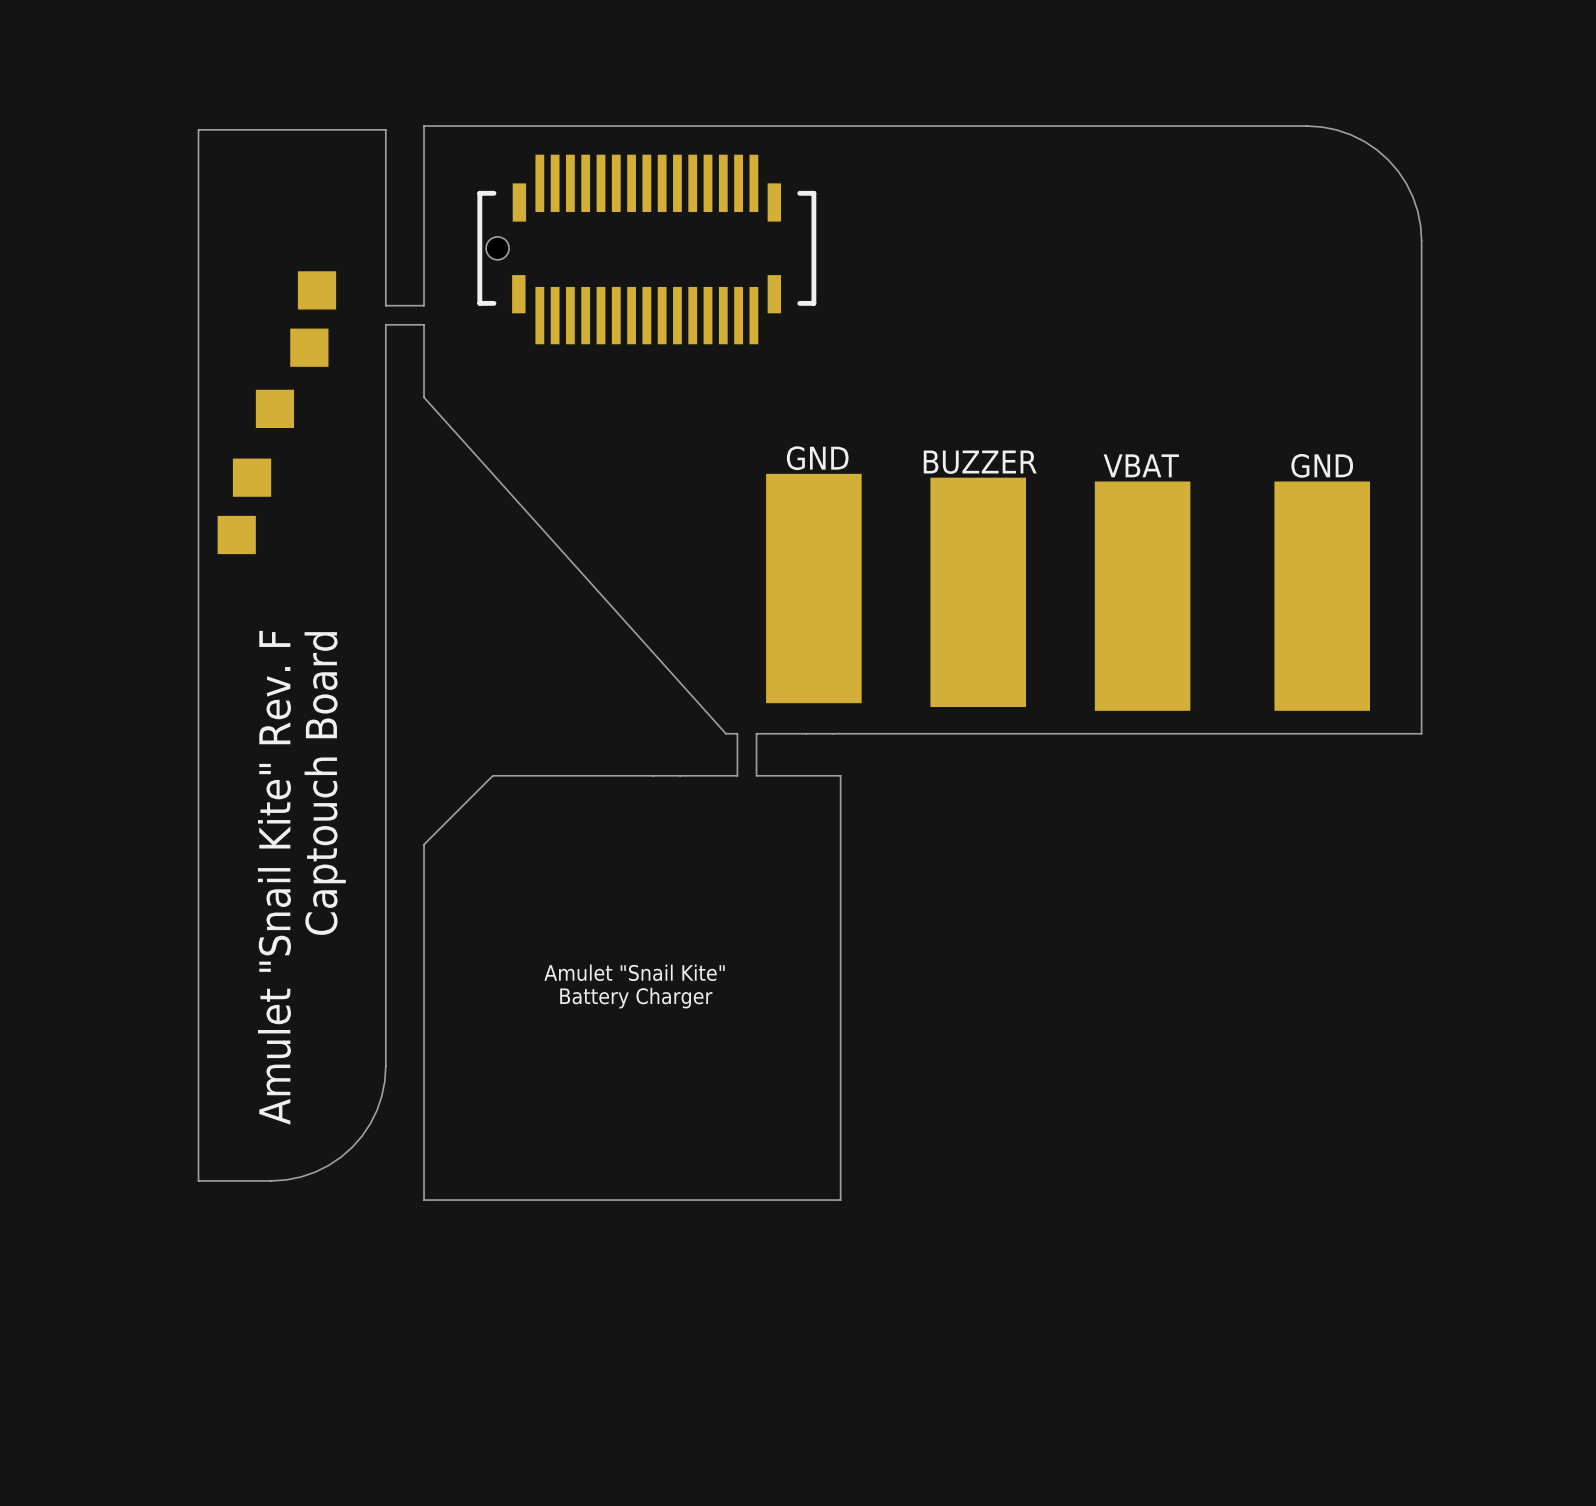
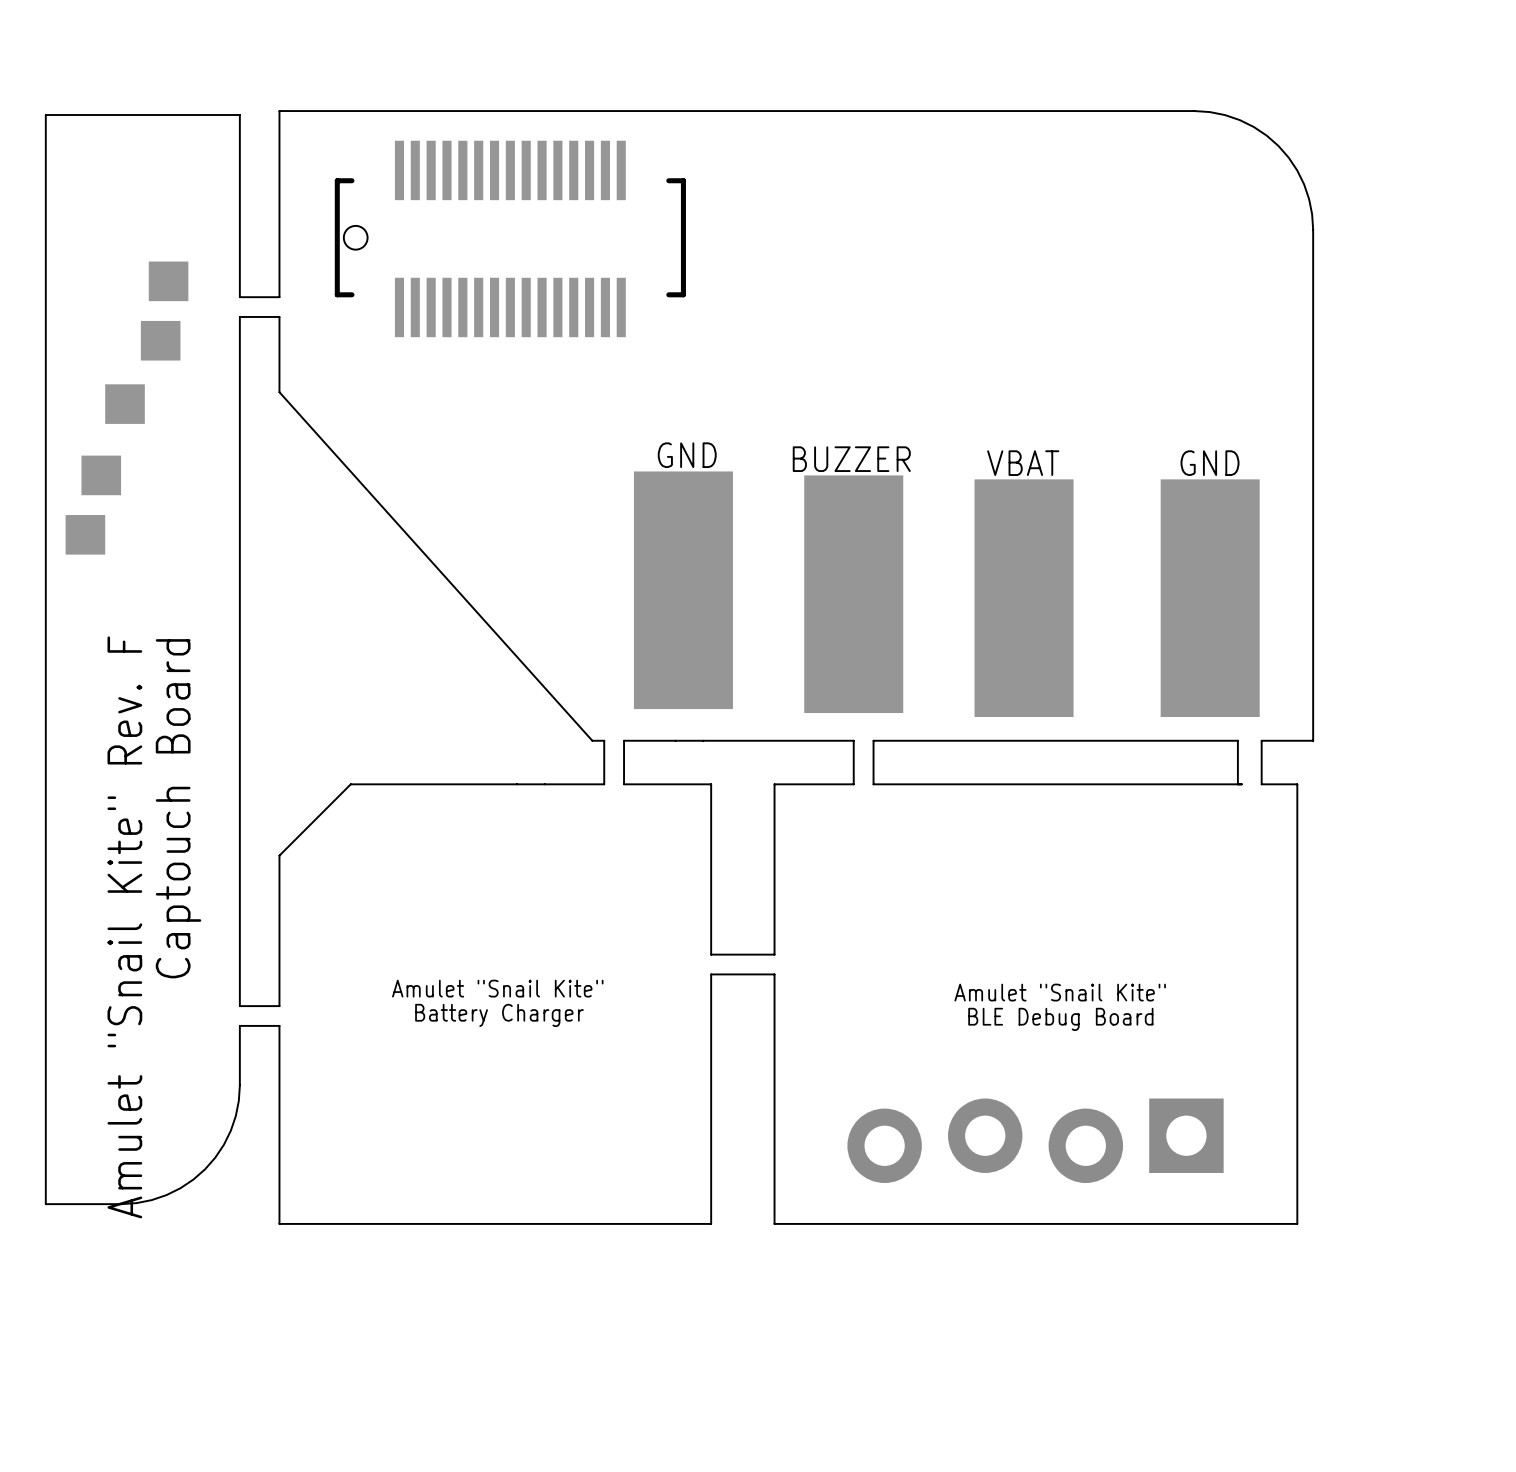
part footprint: [477, 154, 817, 345] -> [334, 140, 686, 338]
board edge: (997, 733) (978, 733) -> (711, 954) (774, 954) (774, 784) (853, 784) (853, 740)
board edge: none -> (873, 740) (873, 784) (1241, 784)
board edge: (1371, 733) (1348, 733) -> (1237, 784) (1237, 740)
board edge: (840, 940) (840, 959) -> (1261, 740) (1261, 784) (1297, 784) (1297, 1223) (774, 1223) (774, 974) (711, 974)
text: none -> Amulet "Snail Kite" (1060, 992)
board edge: (385, 989) (385, 1008) -> (279, 1025) (239, 1025)
board edge: (424, 989) (424, 1008) -> (279, 1006) (239, 1006)
text: none -> BLE Debug Board (1060, 1019)
part: none -> (1035, 1140)

